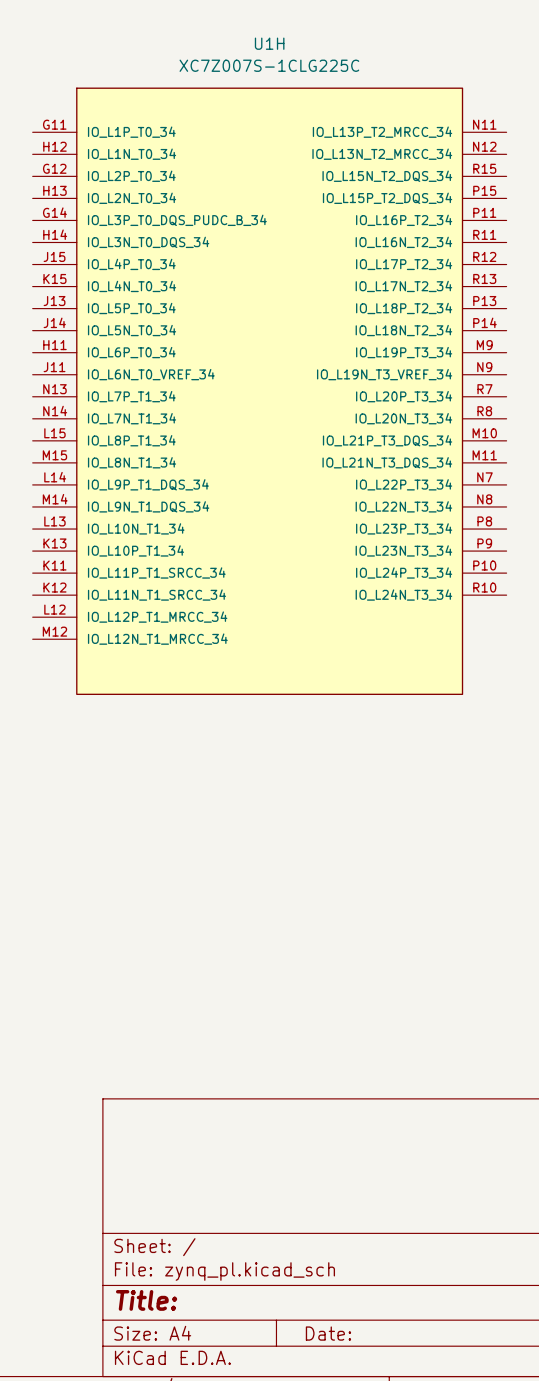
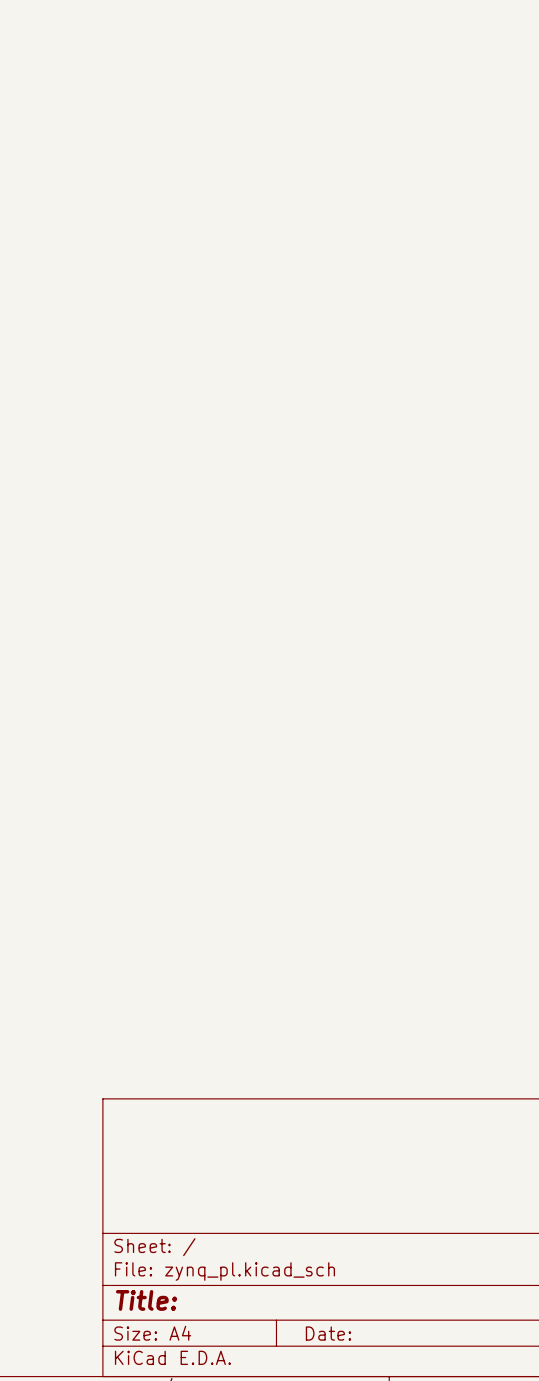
U1H: XC7Z007S-1CLG225C (269, 391) -> none

